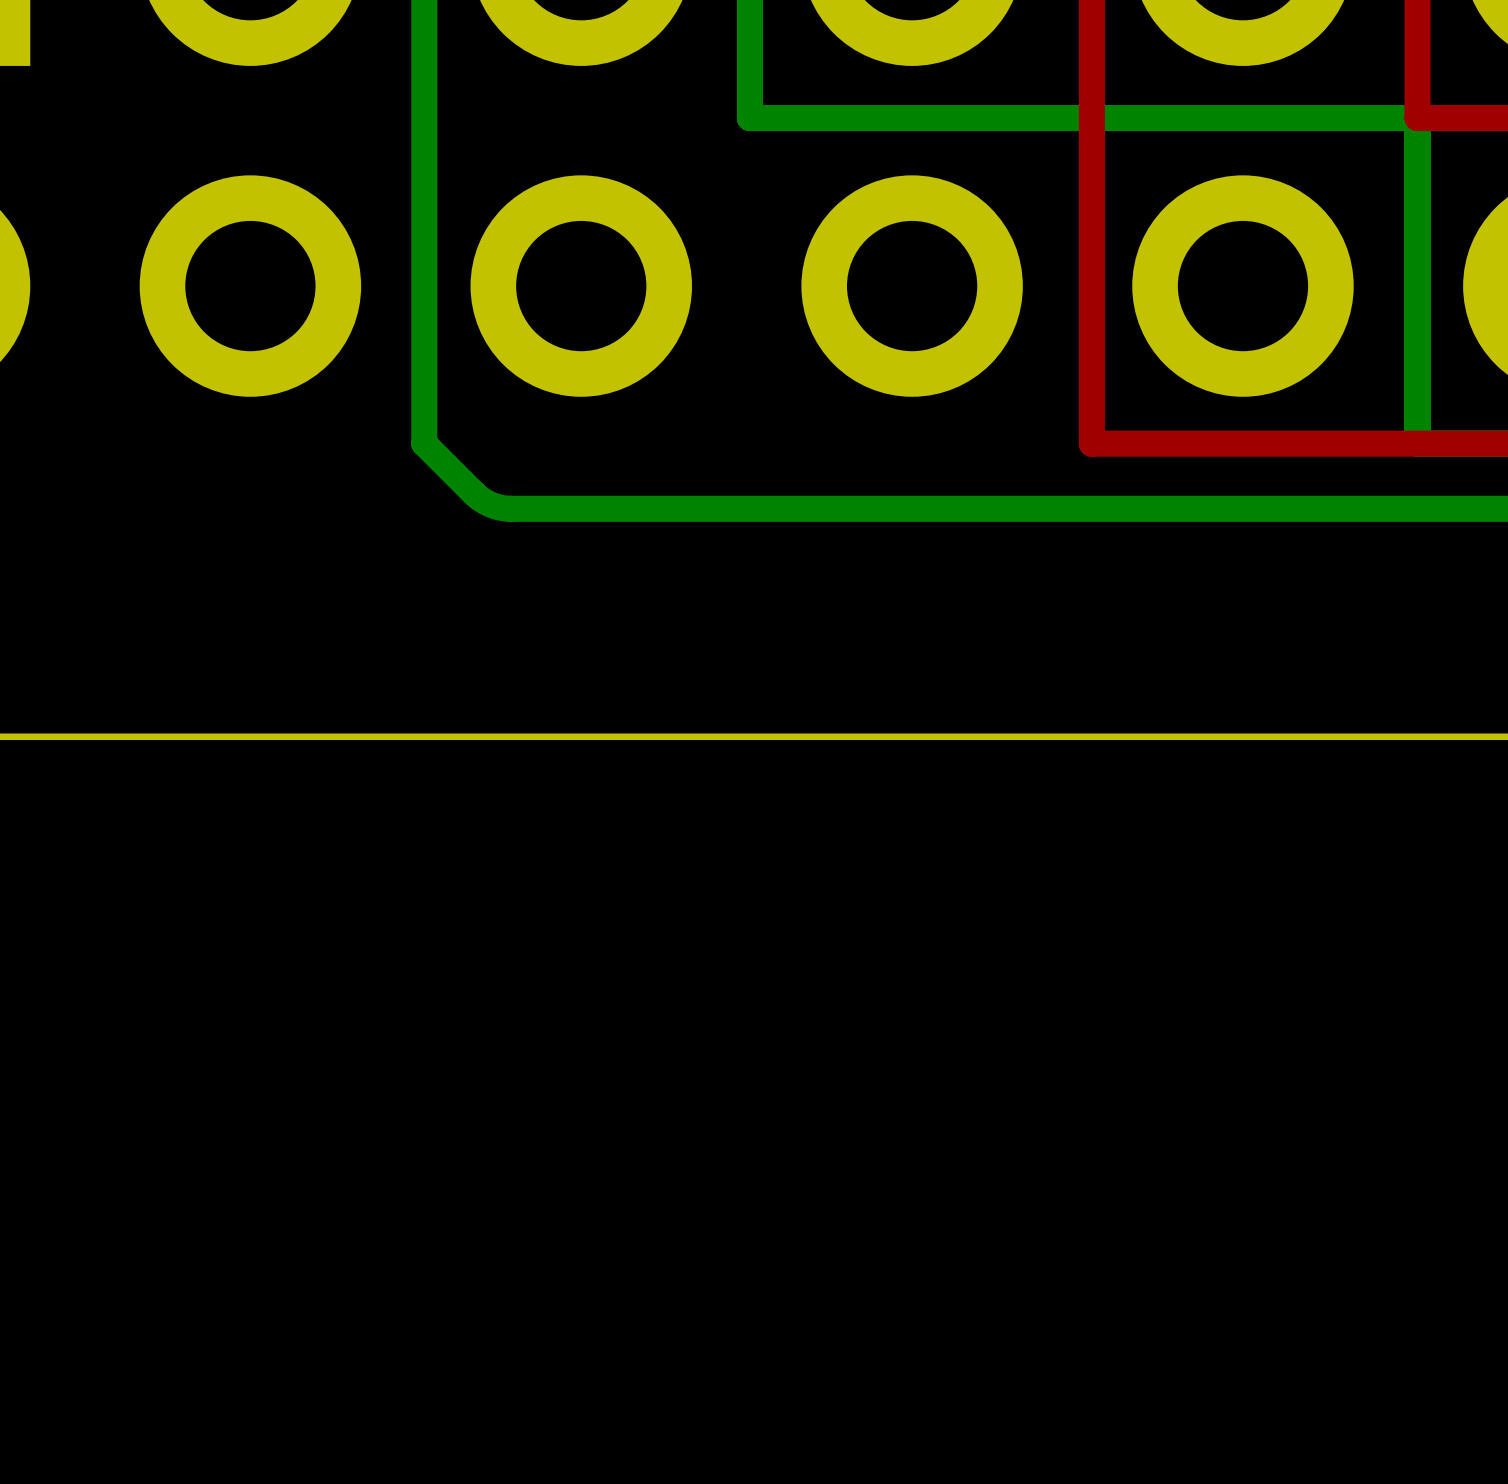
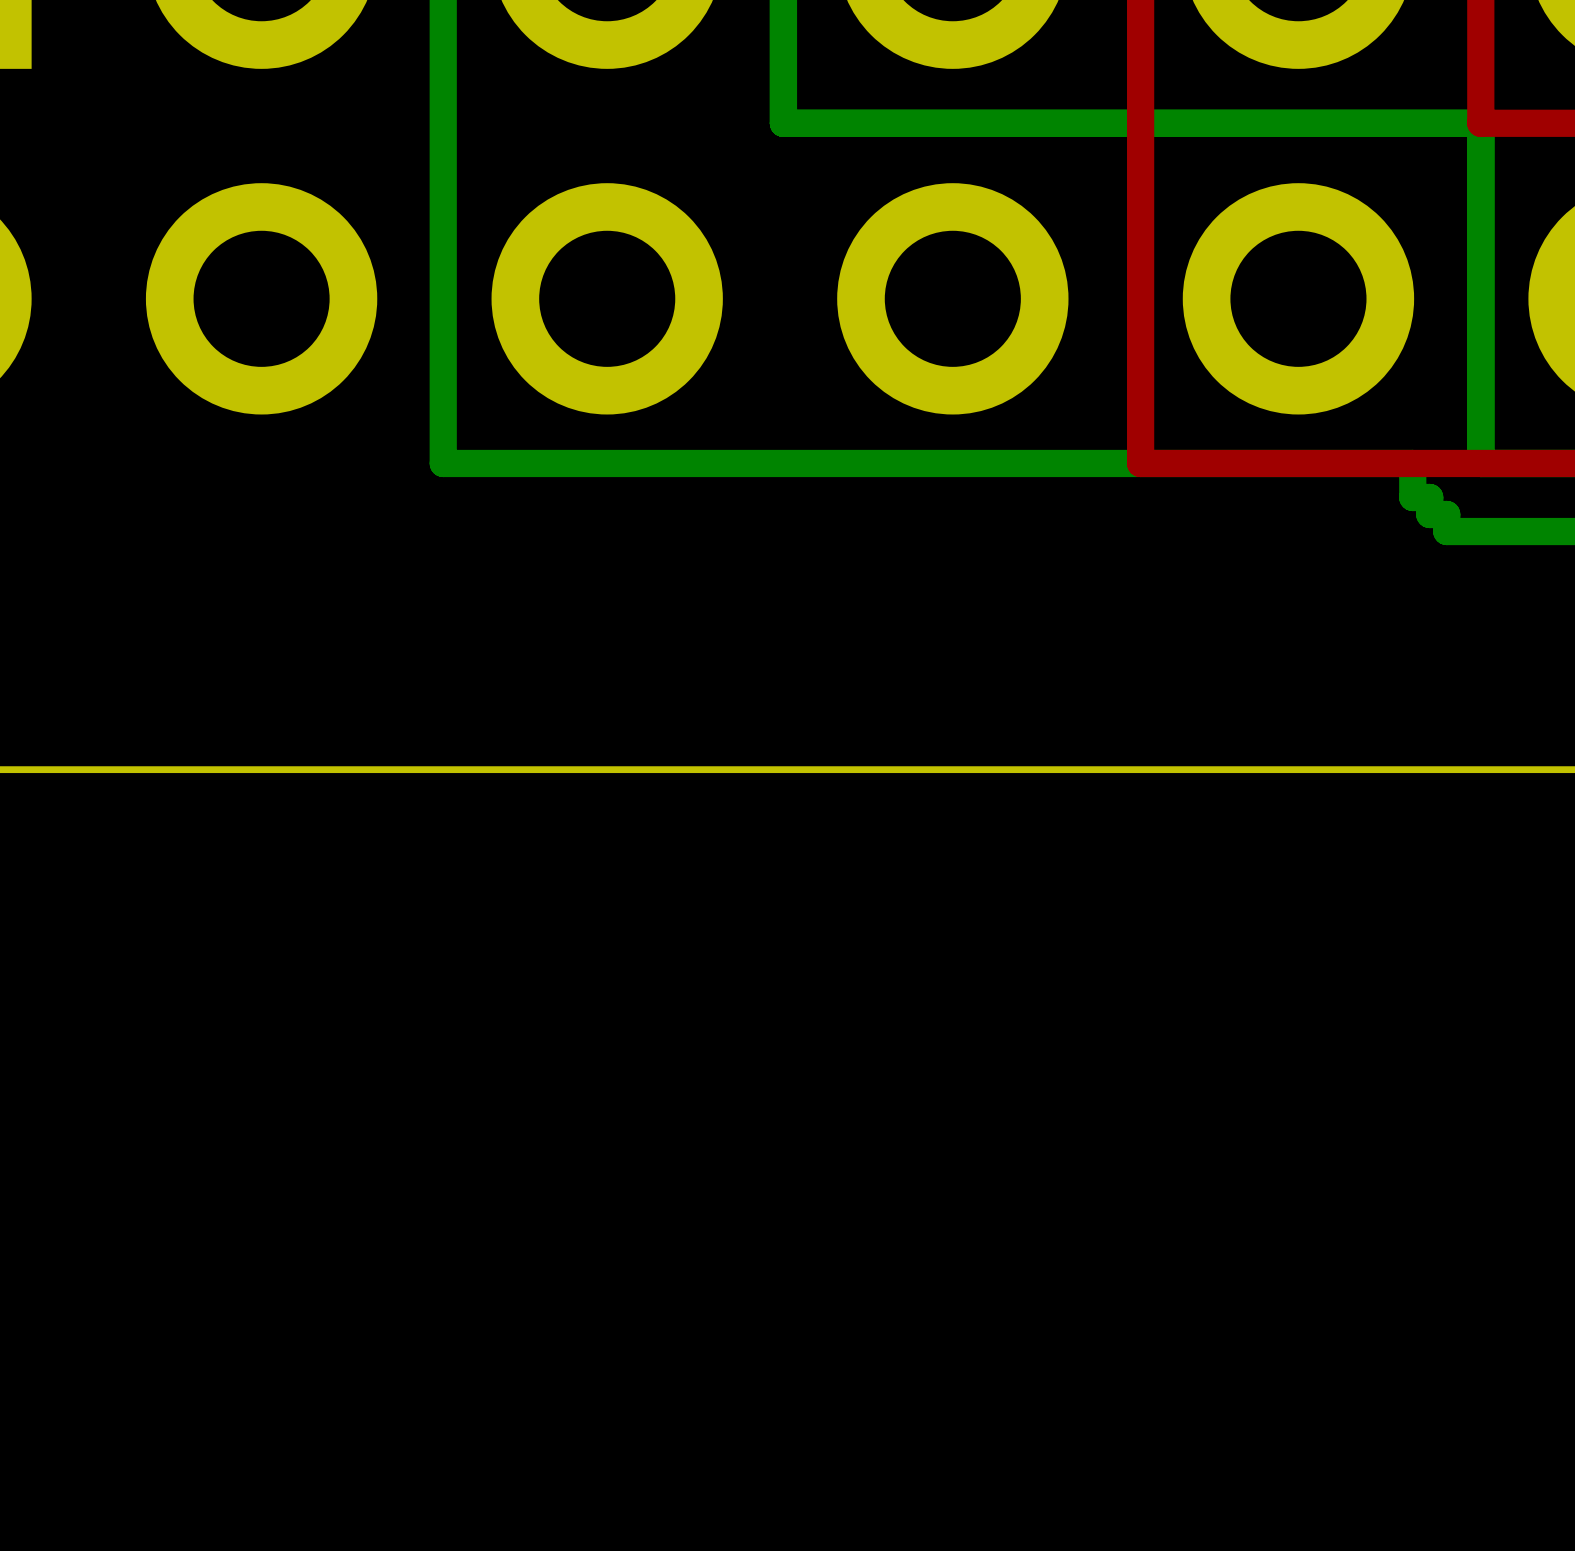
bottom track: (424, 443) (479, 498) (491, 504) (504, 508) (1384, 508) -> (443, 463) (1412, 463) (1412, 497) (1429, 497) (1429, 514) (1446, 514) (1446, 531)

